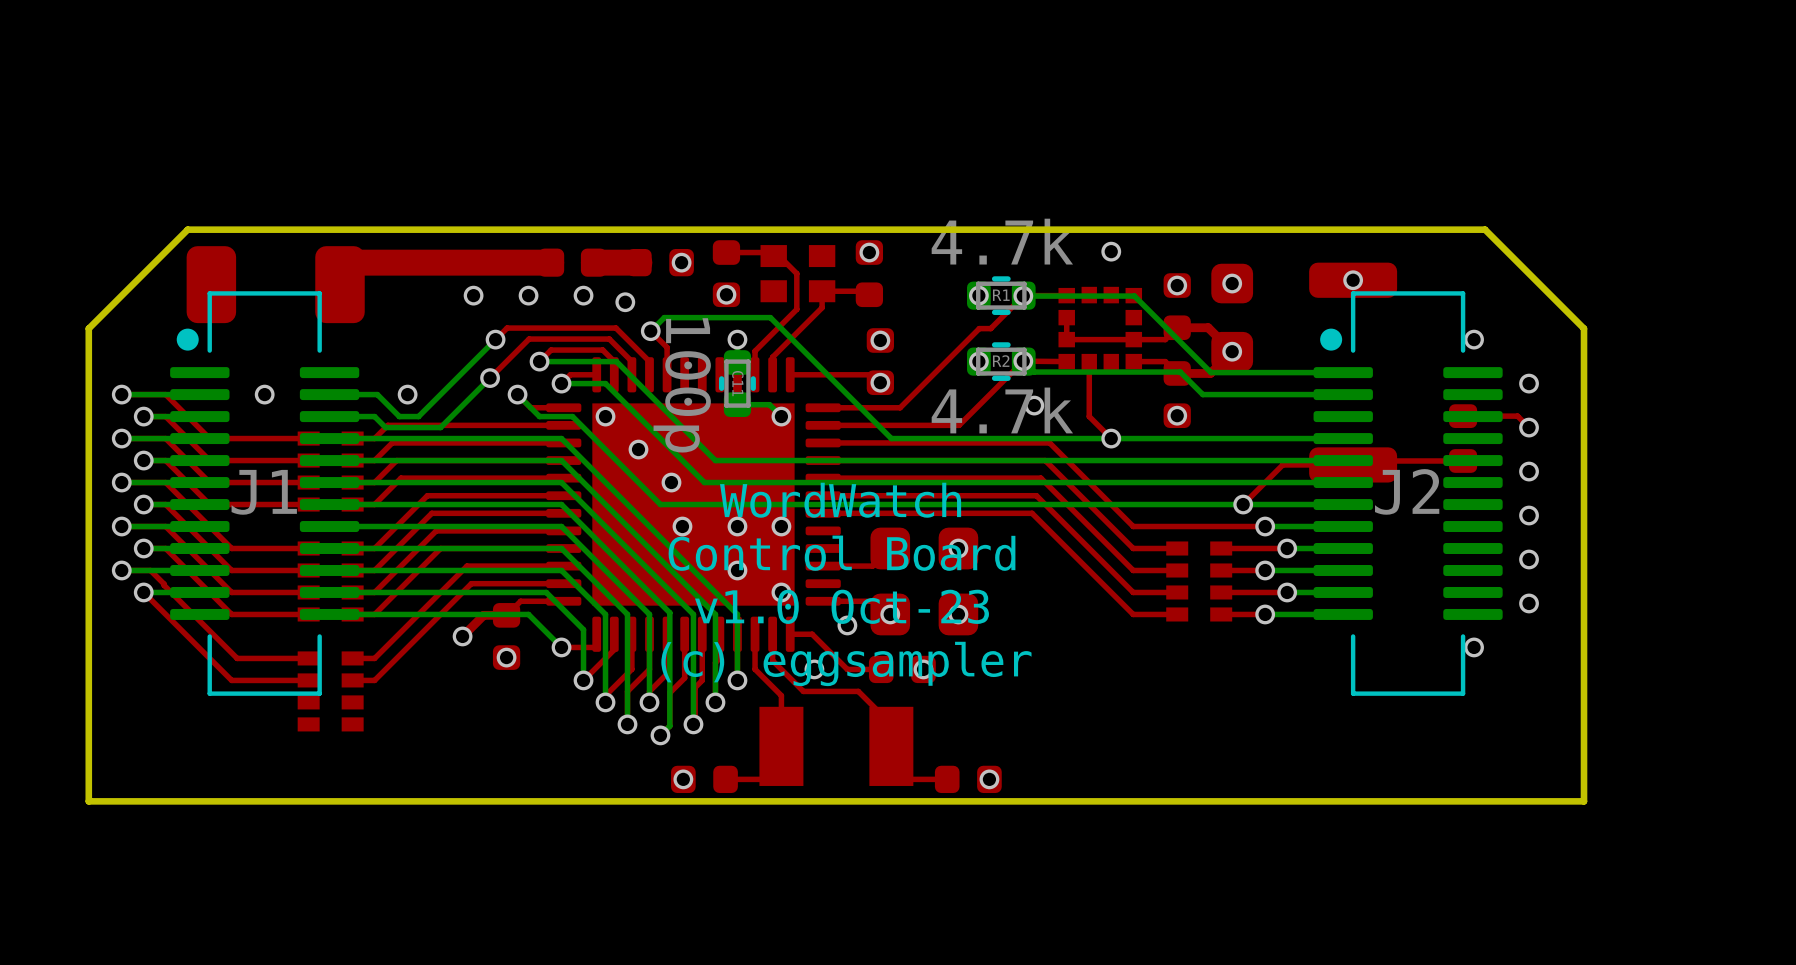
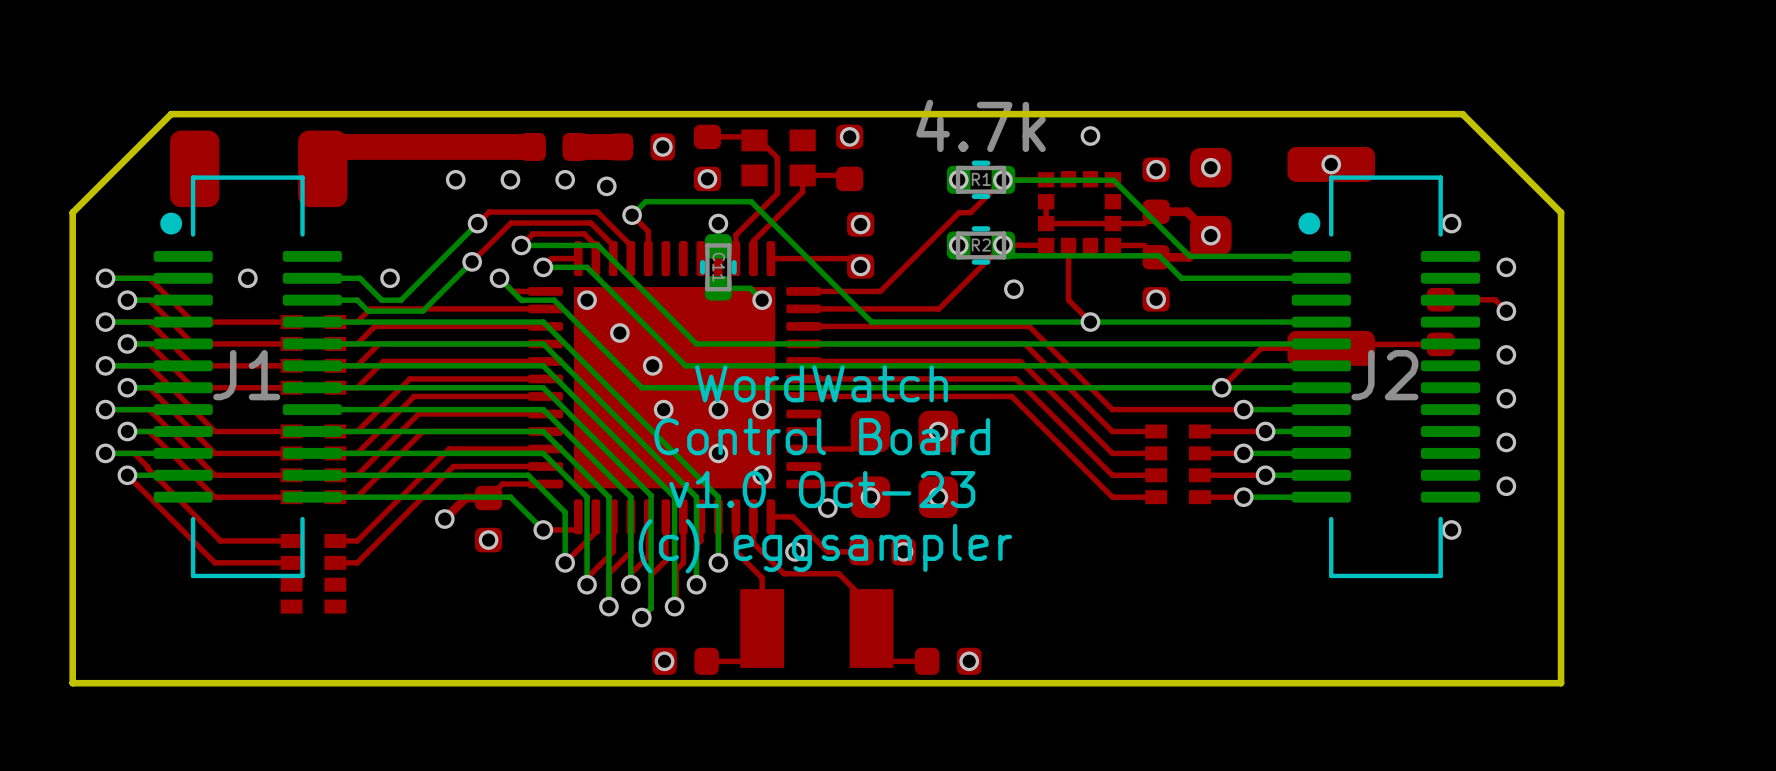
C11 value: 100p (682, 385) -> none
R2 value: 4.7k (1002, 410) -> none

